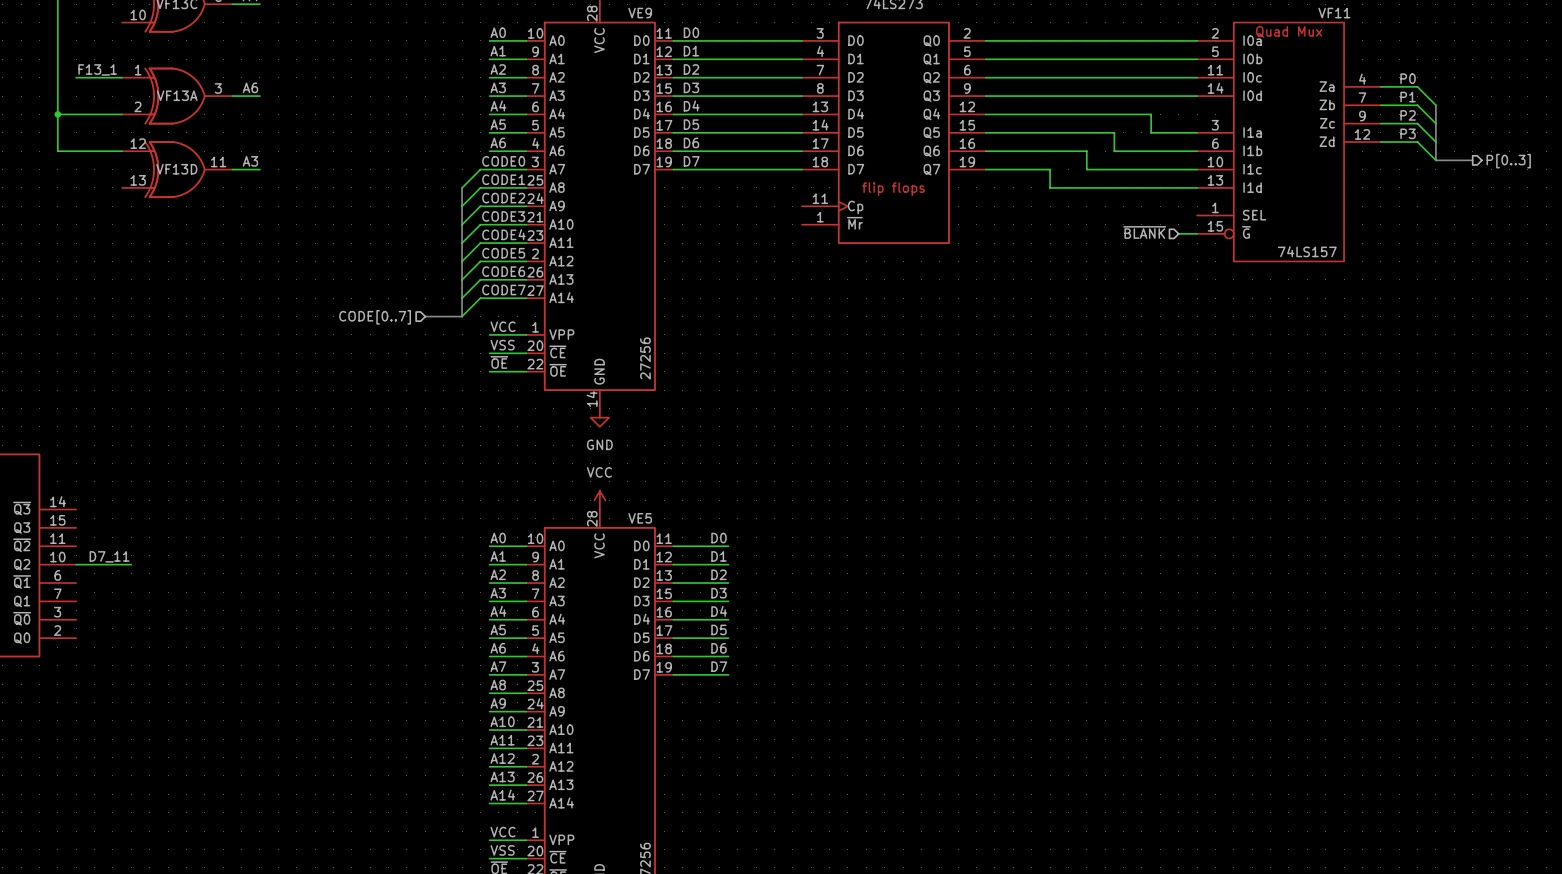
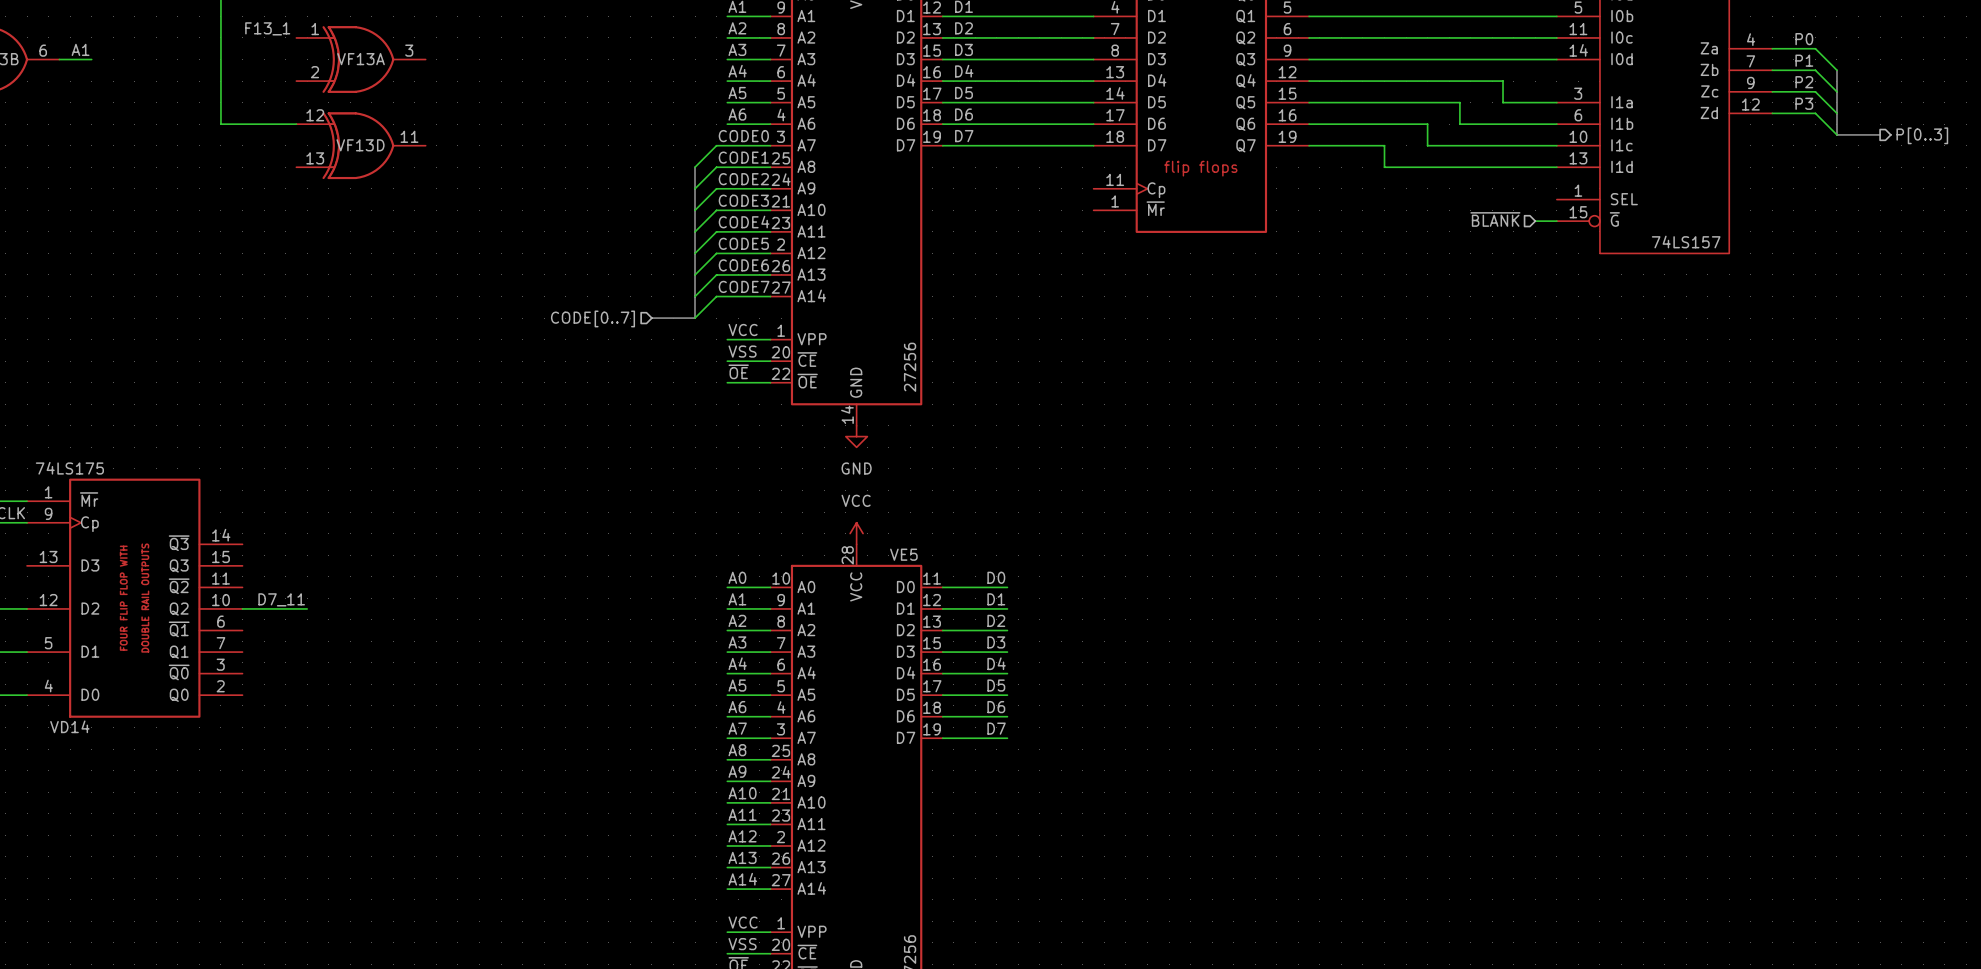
wire: (76, 77) (122, 77) -> none
label: A6 (250, 87) -> none
wire: (232, 96) (259, 96) -> none
wire: (57, 114) (122, 114) -> none
junction: (57, 114) -> none
label: A3 (250, 161) -> none
wire: (232, 169) (259, 169) -> none

